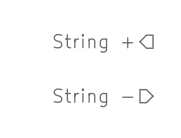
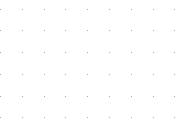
hierarchical label: String + (93, 43) -> none
hierarchical label: String - (93, 97) -> none

